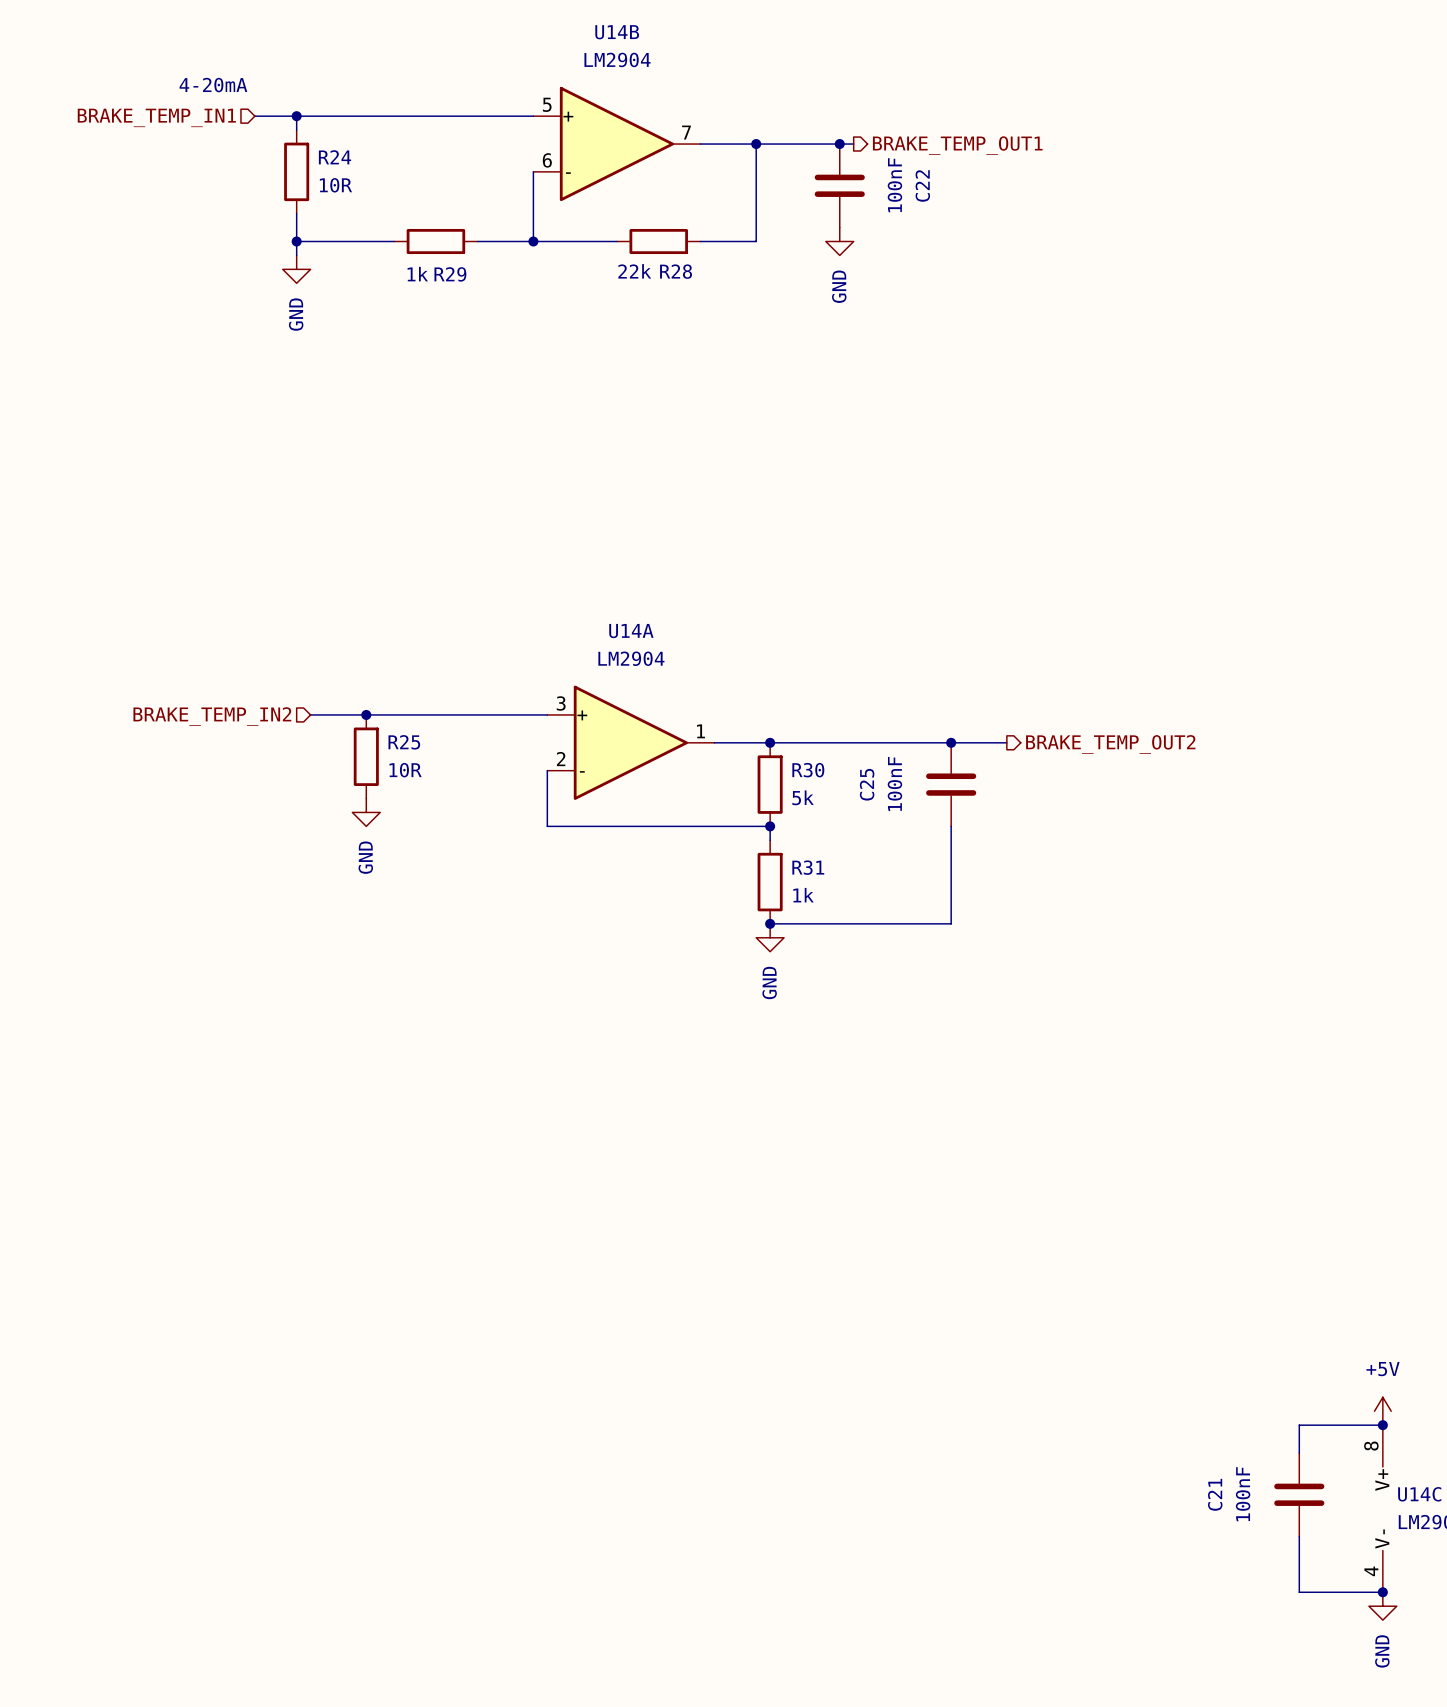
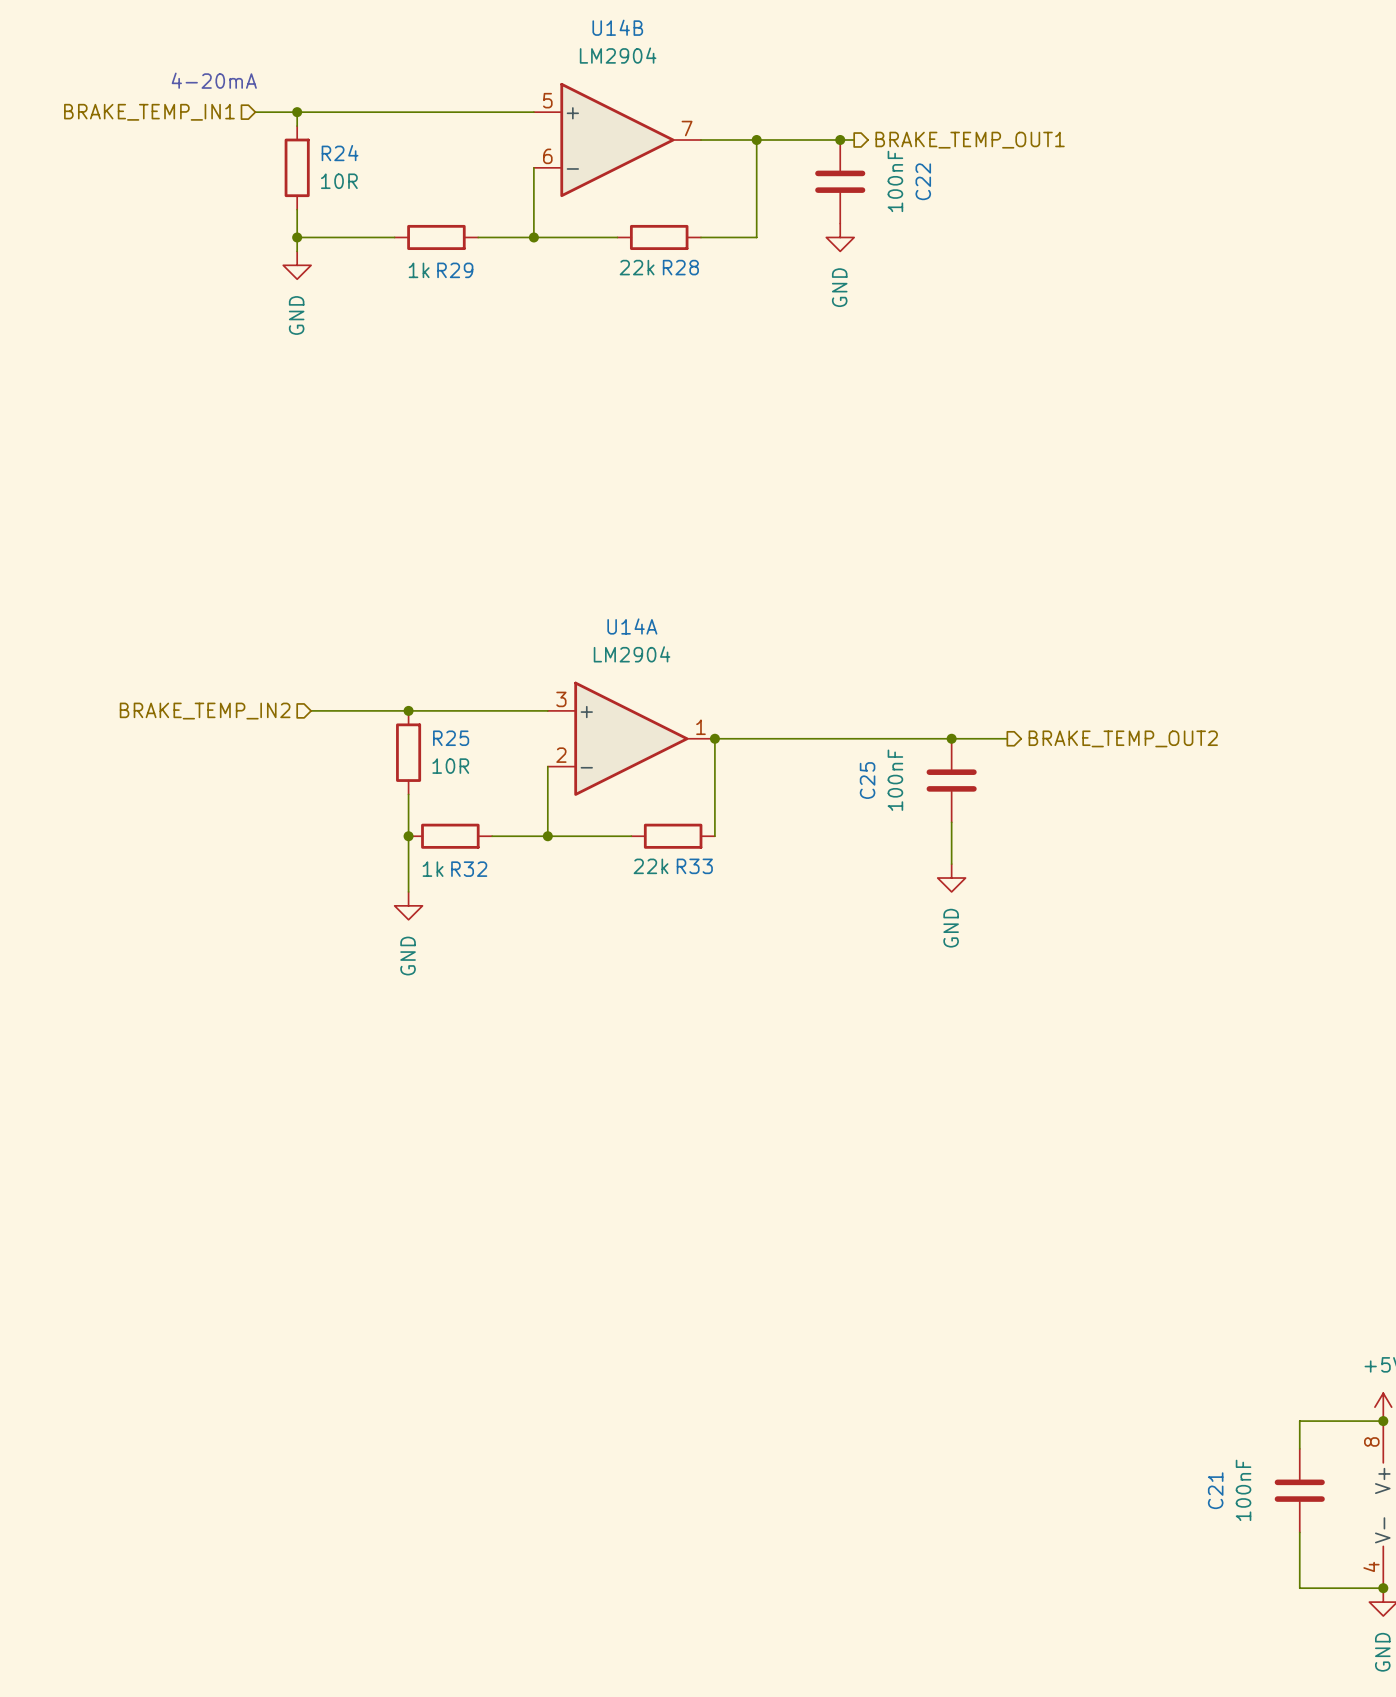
junction position: (366, 714) -> (408, 710)
wire: none -> (714, 738) (714, 836)
junction: none -> (714, 738)
junction: (770, 742) -> none
R25 position: (366, 756) -> (408, 752)
R30: 5k (770, 784) -> none
wire: none -> (408, 794) (408, 891)
power symbol position: GND (366, 812) -> GND (408, 905)
wire: (547, 826) (770, 826) (770, 840) -> (547, 822) (547, 836)
junction: (770, 826) -> none
junction: none -> (408, 836)
R32: none -> 1k (450, 836)
wire: none -> (492, 836) (631, 836)
junction: none -> (547, 836)
R33: none -> 22k (673, 836)
wire: (951, 868) (951, 923) (770, 923) -> none
R31: 1k (770, 882) -> none
power symbol: none -> GND (951, 878)
junction: (770, 923) -> none
power symbol: GND (770, 937) -> none

